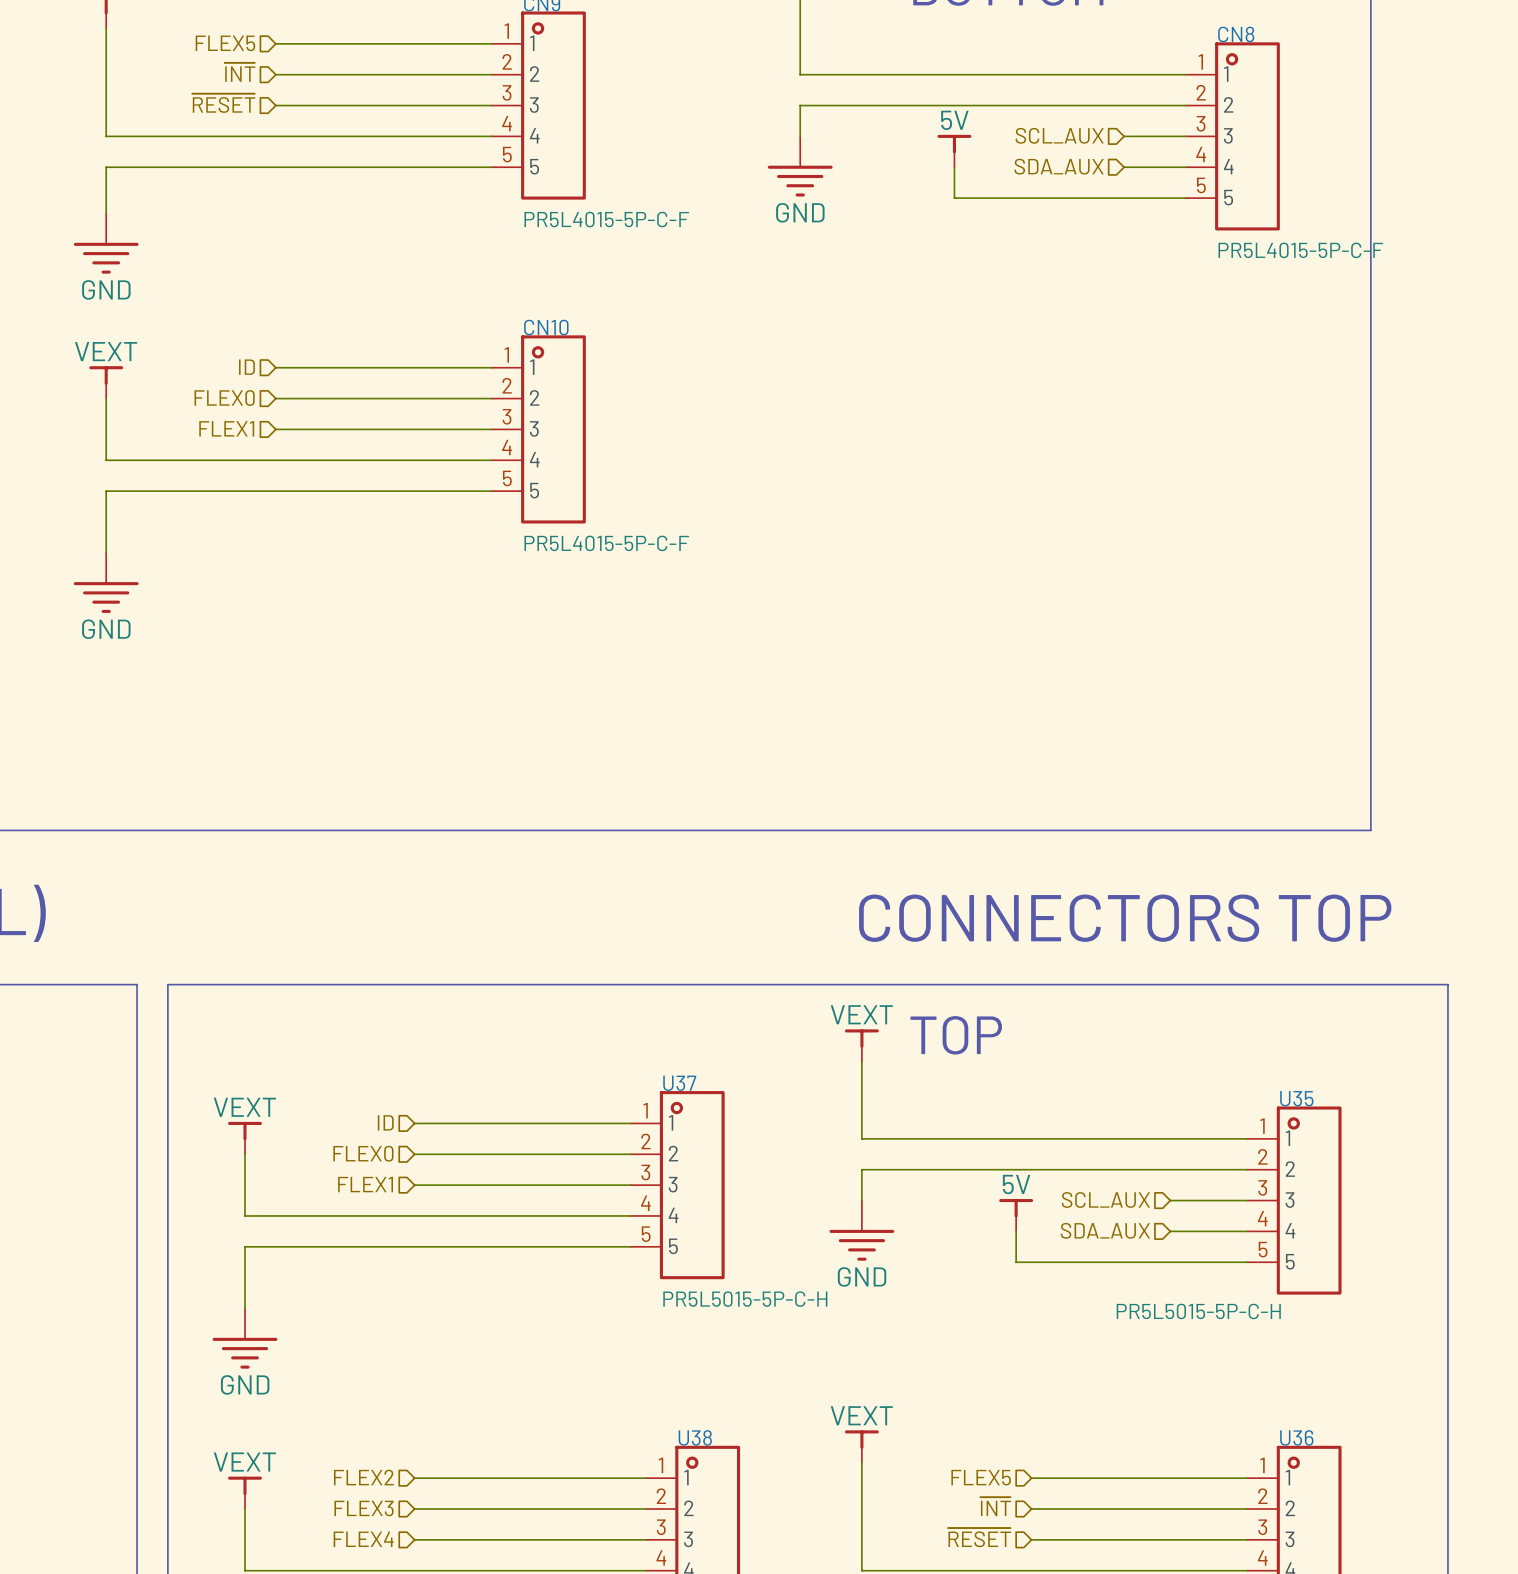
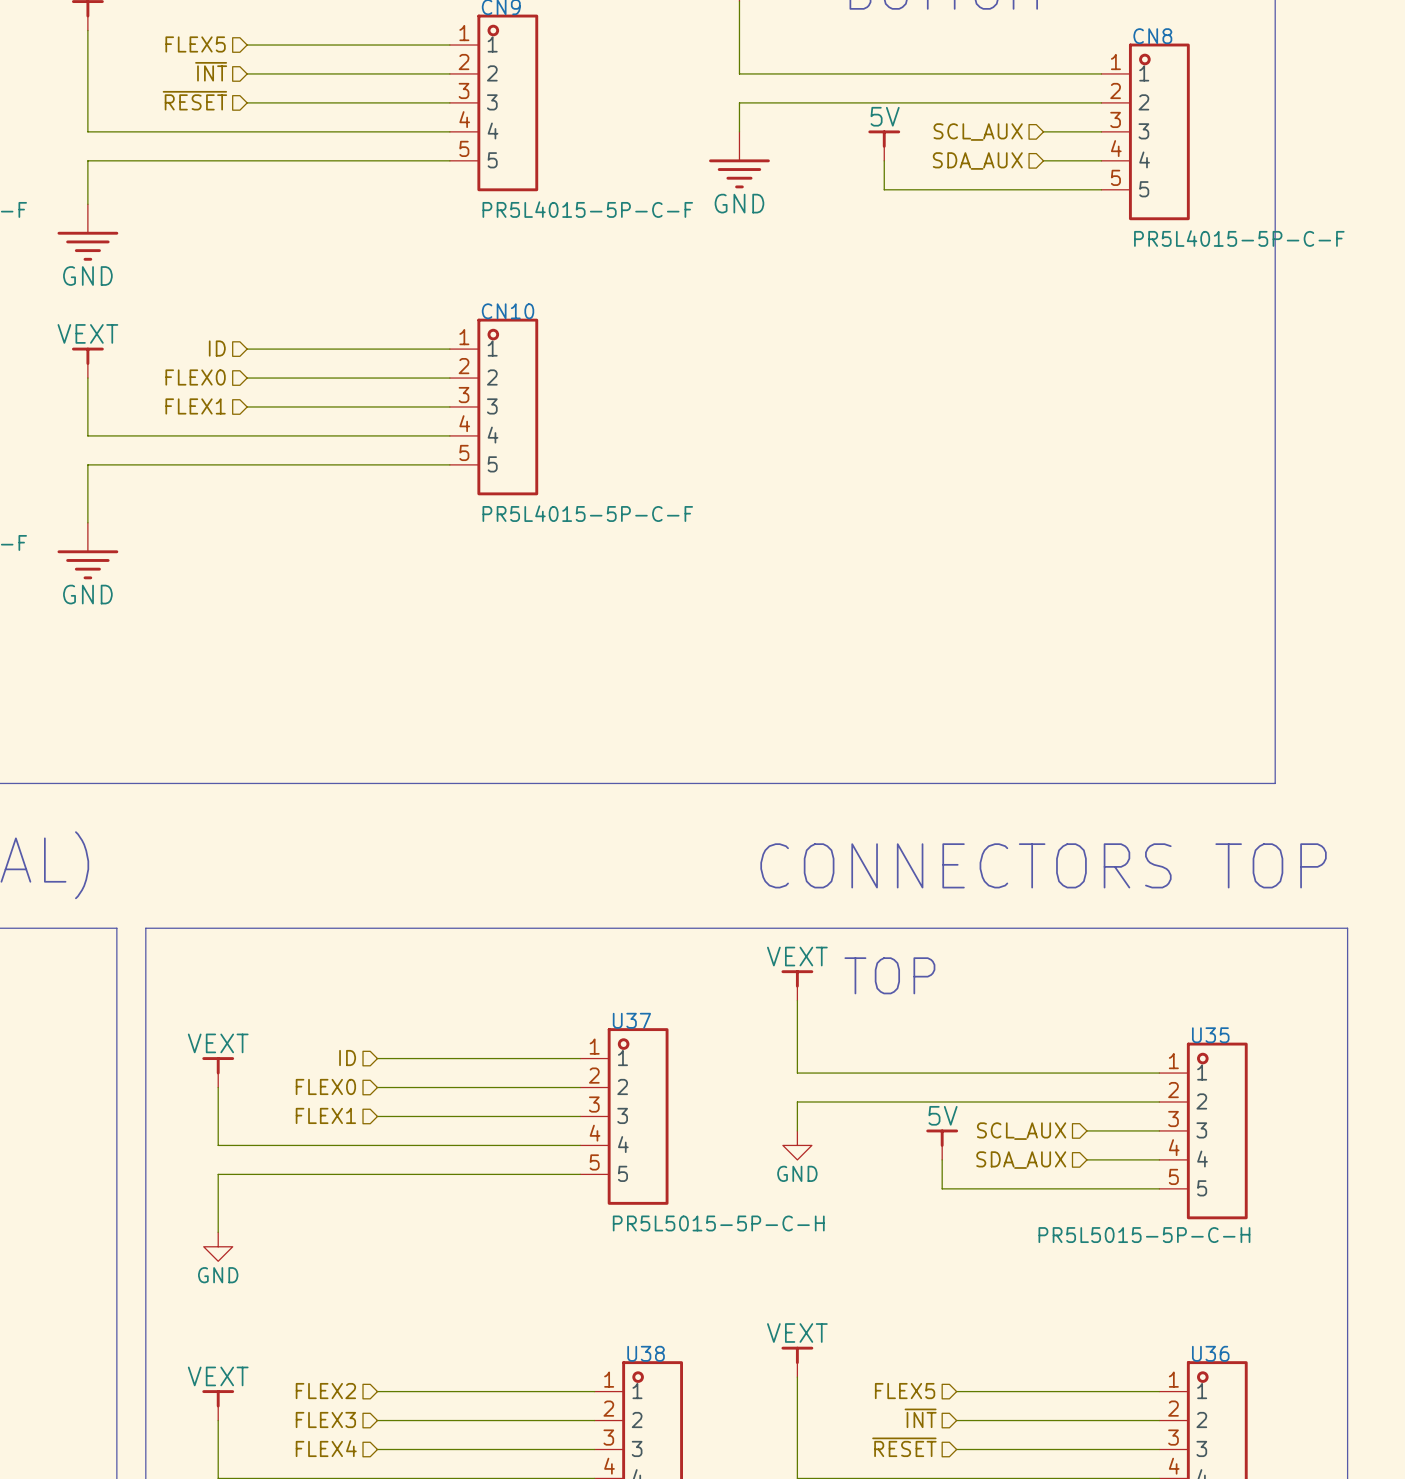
power symbol: none -> GND (797, 1145)
power symbol: GND (861, 1230) -> none
power symbol: none -> GND (218, 1246)
power symbol: GND (245, 1338) -> none

